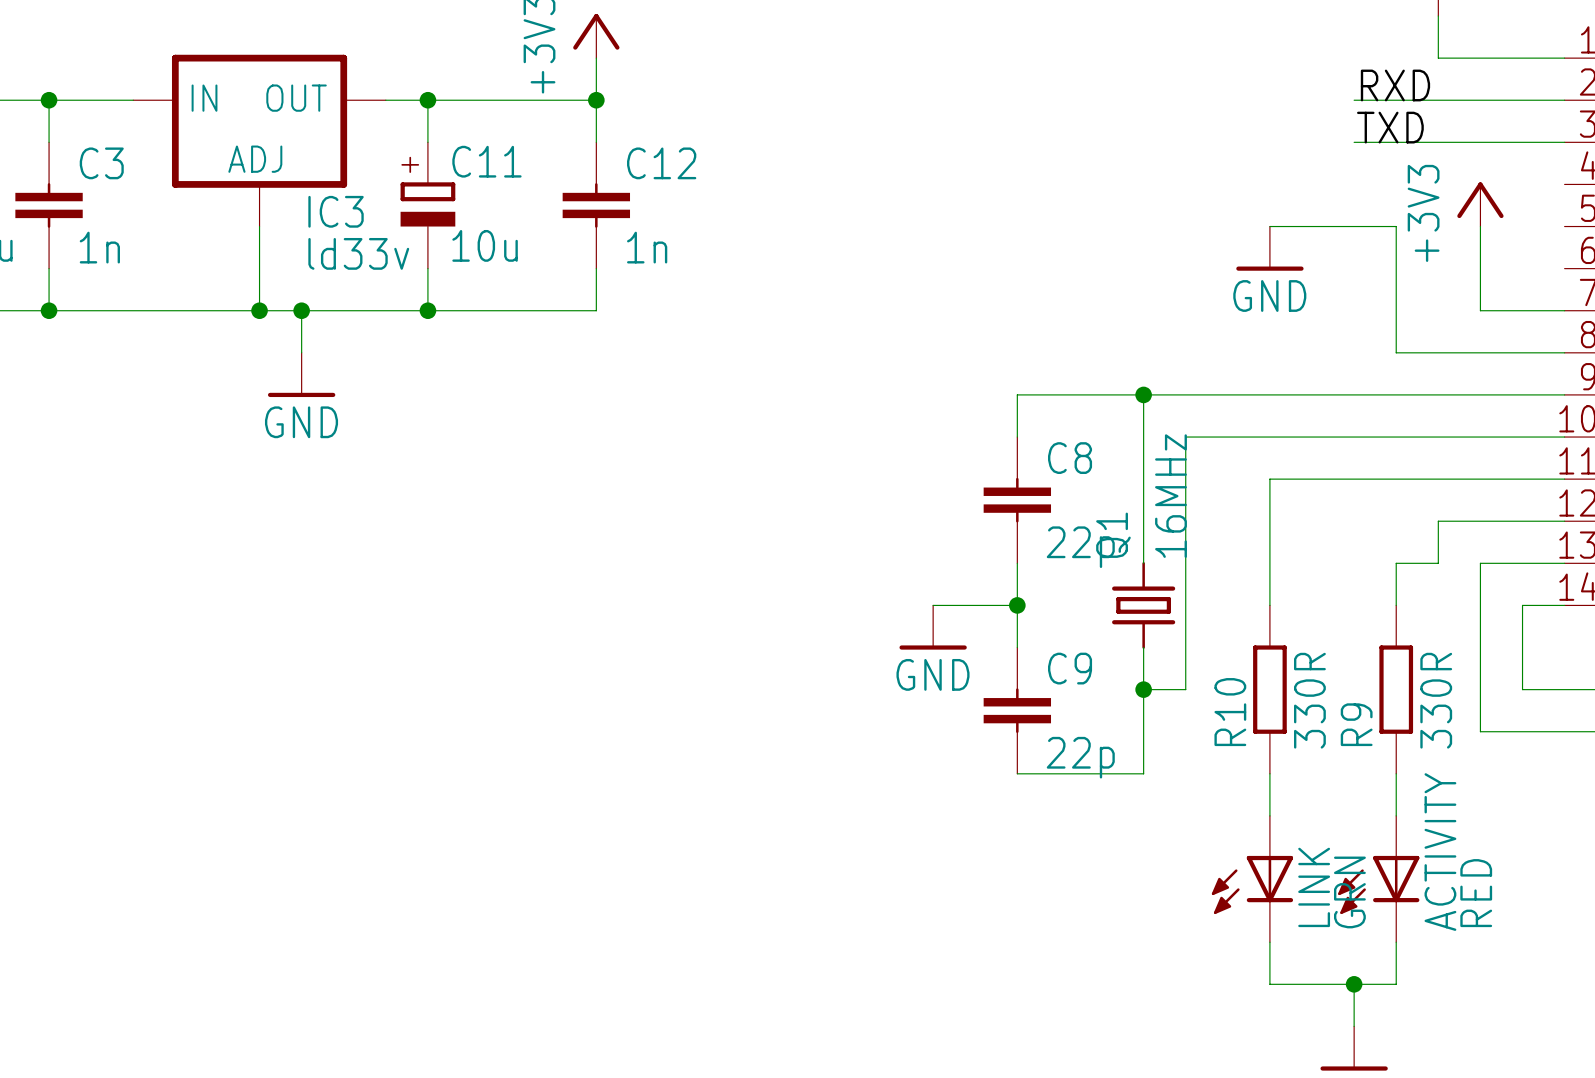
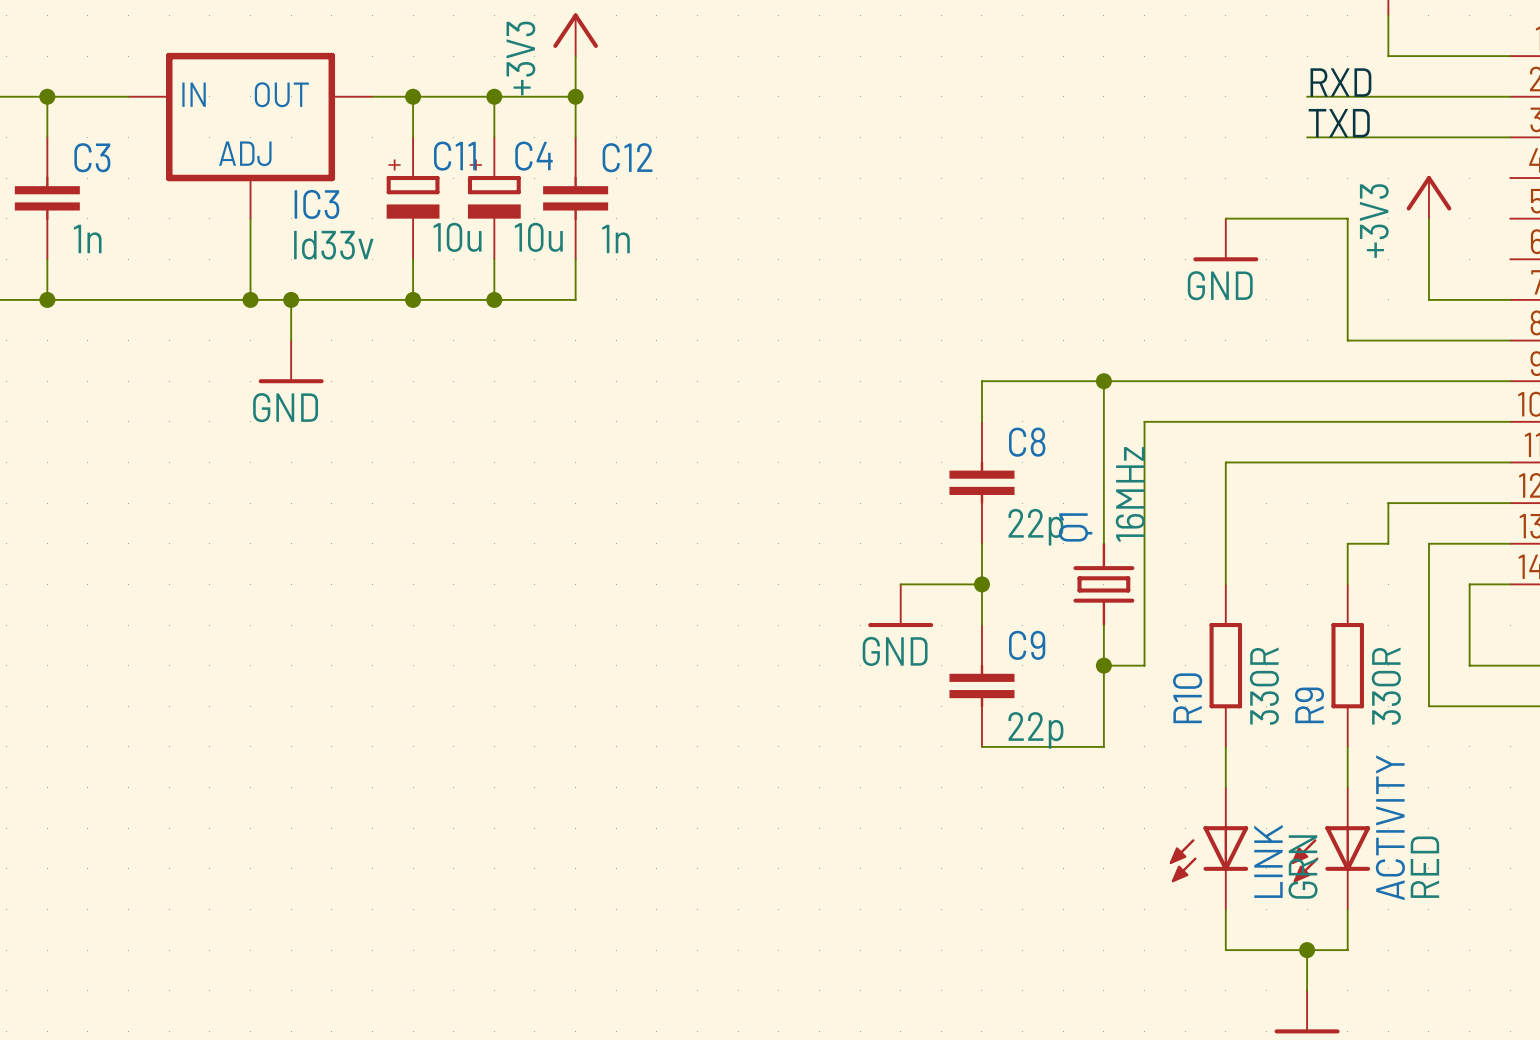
wire: none -> (494, 96) (494, 137)
junction: none -> (494, 96)
C4: none -> 10u (494, 198)
wire: none -> (494, 259) (494, 299)
junction: none -> (494, 299)

